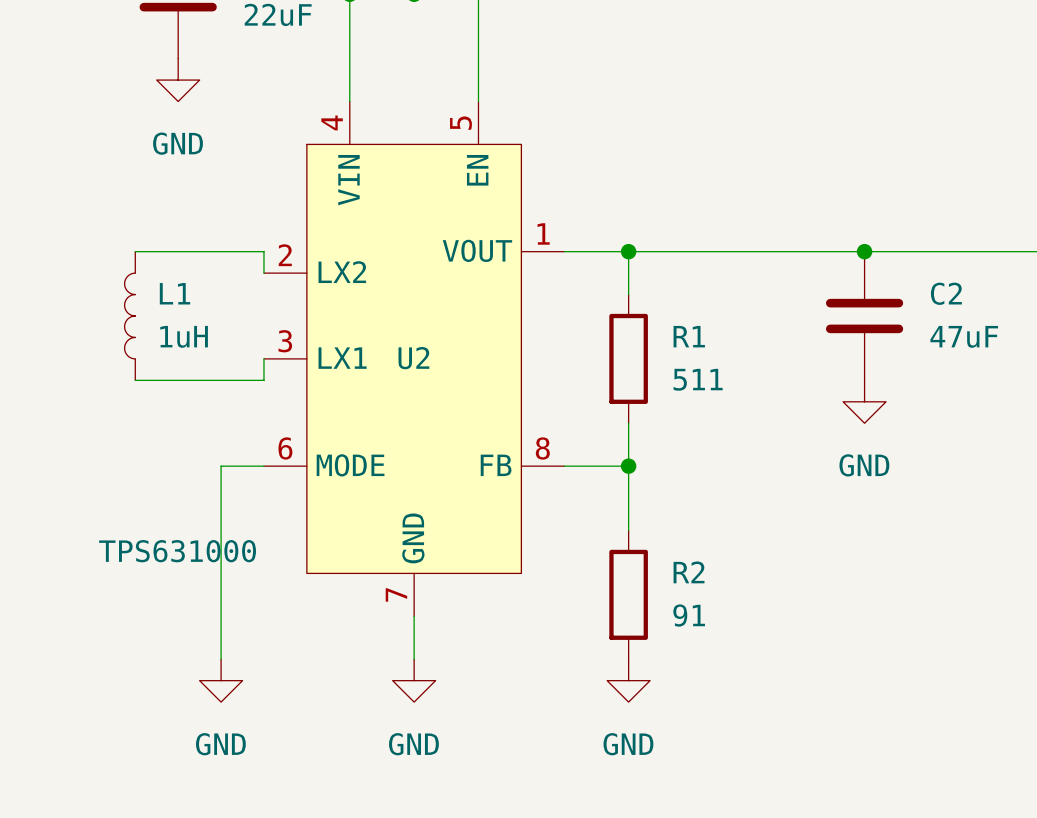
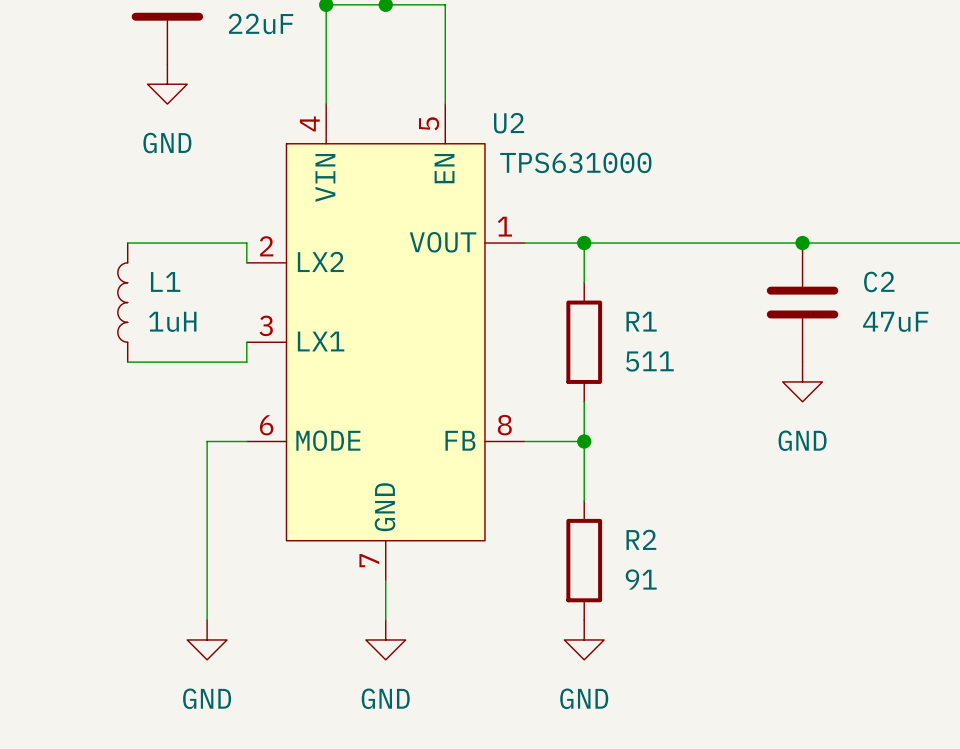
U2 name position: U2 (413, 358) -> U2 (509, 123)
U2 value position: TPS631000 (177, 551) -> TPS631000 (575, 162)

